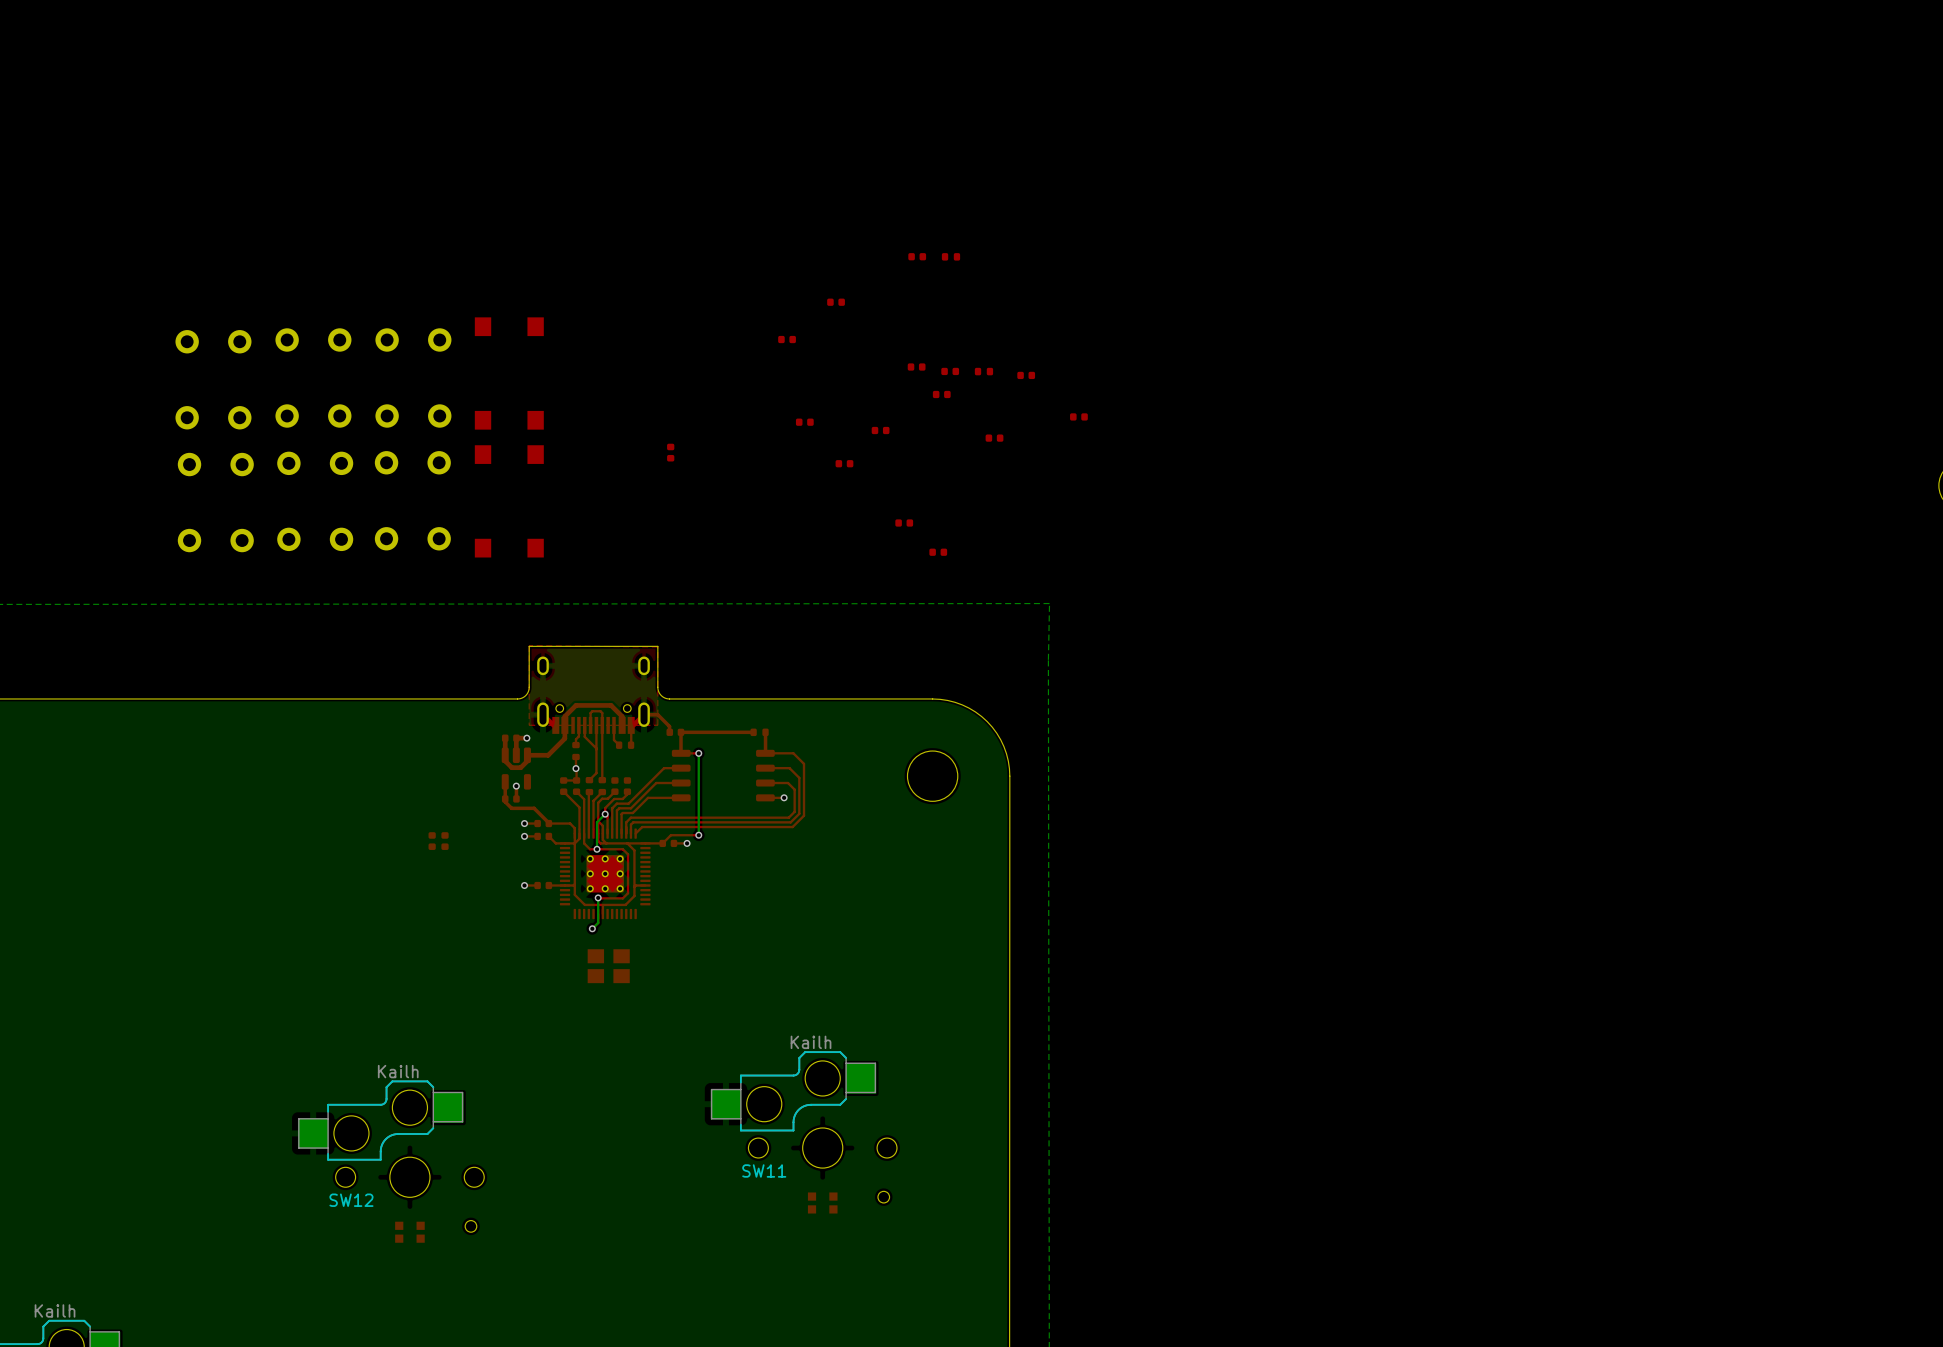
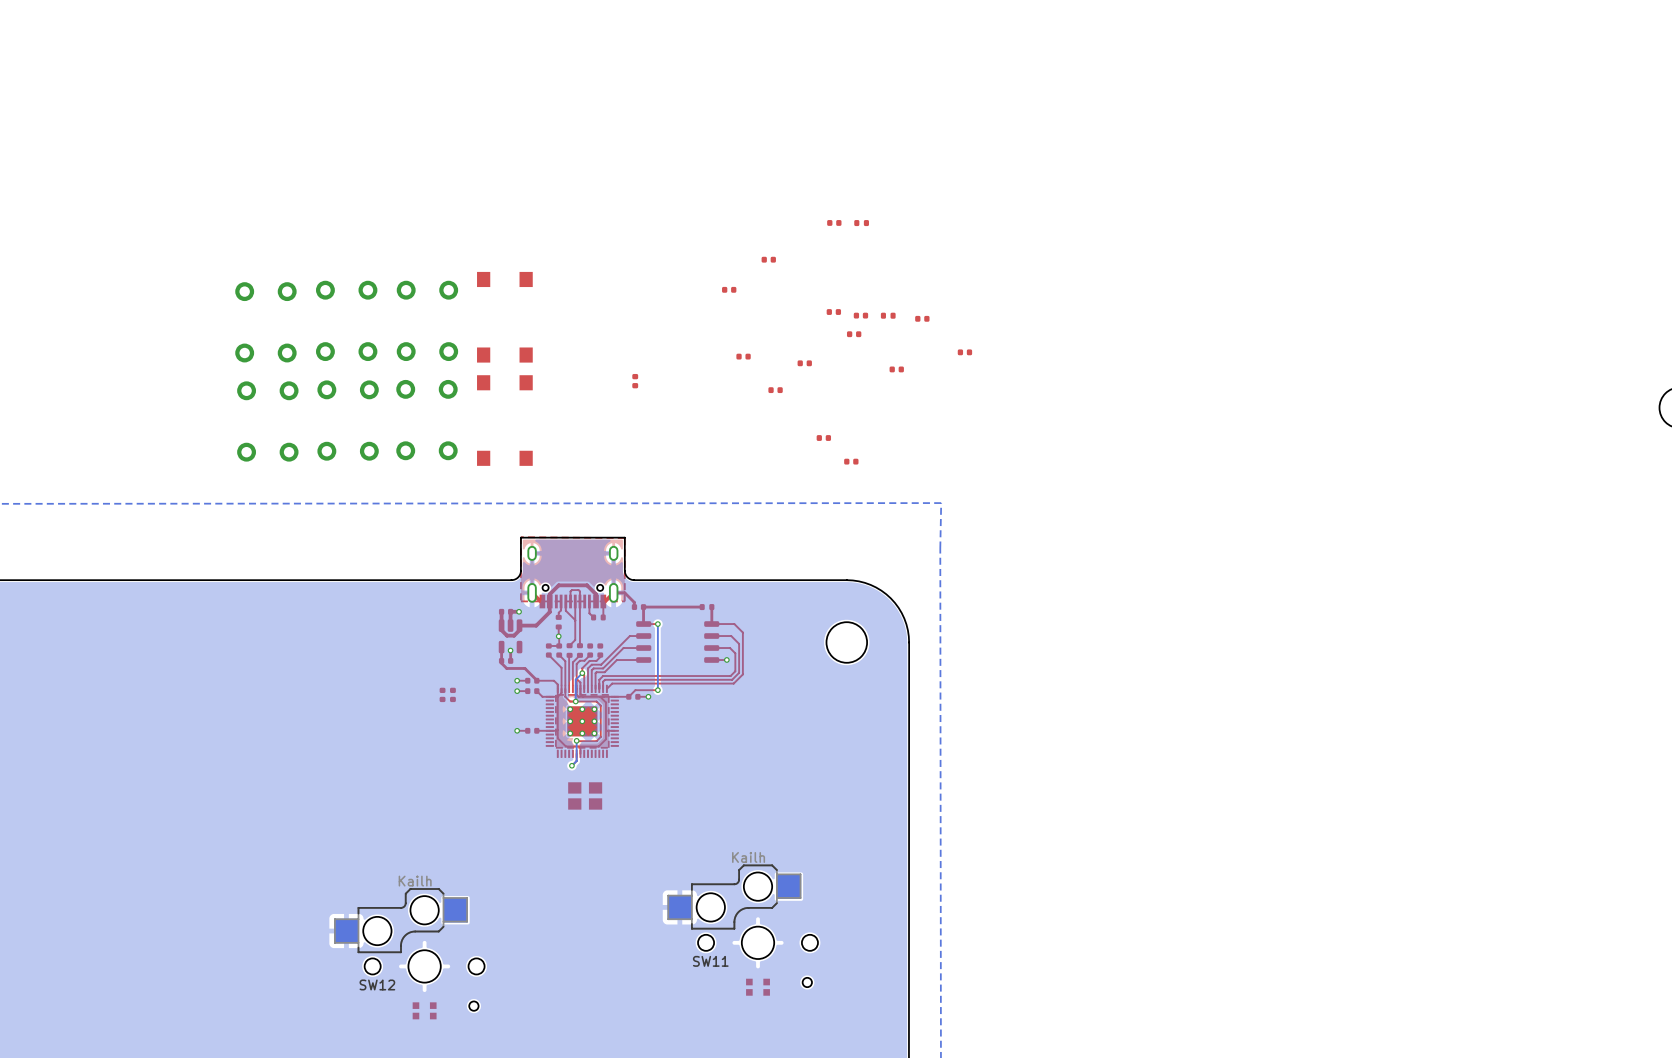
top zone outline: none -> (608, 694) (608, 747) (555, 747) (555, 694) (608, 694)

